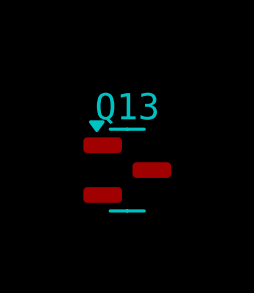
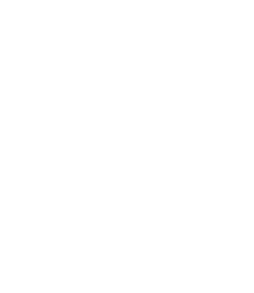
Q13: (127, 166) -> none

